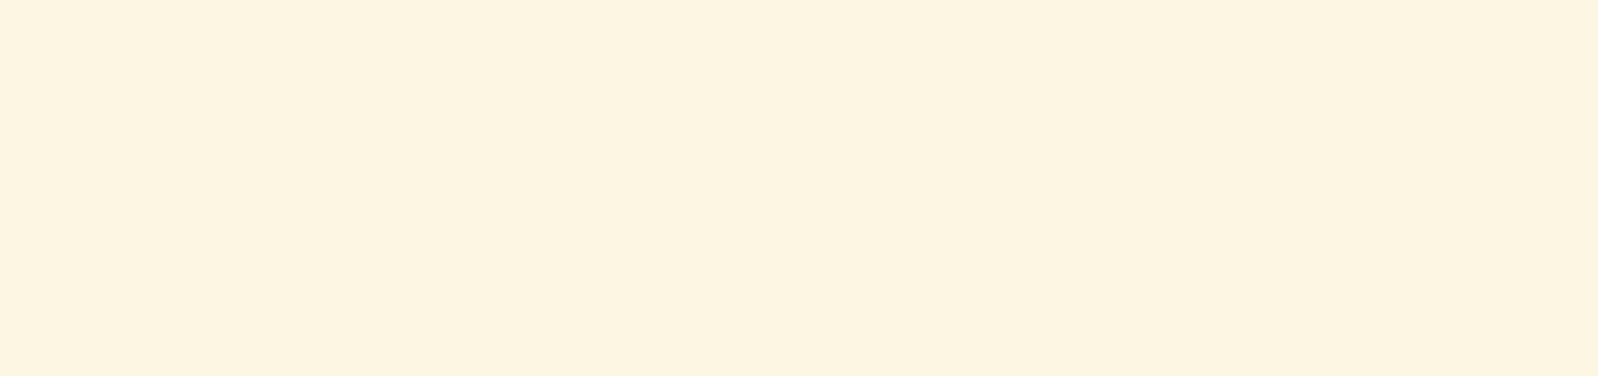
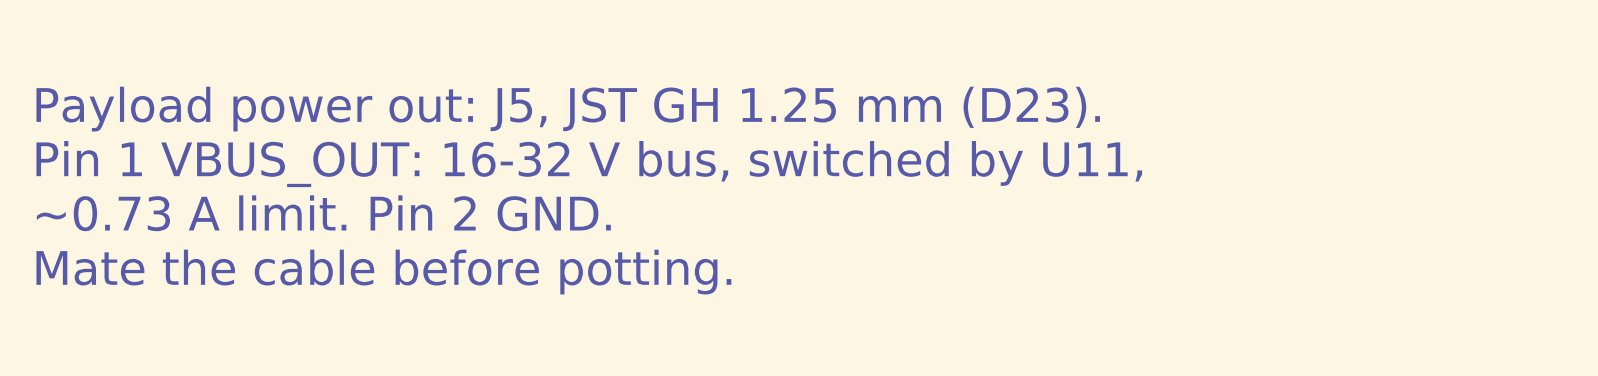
text: none -> Payload power out: J5, JST GH 1.25 mm (D23). (568, 109)
text: none -> Pin 1 VBUS_OUT: 16-32 V bus, switched by U11, (589, 164)
text: none -> ~0.73 A limit. Pin 2 GND. (323, 213)
text: none -> Mate the cable before potting. (383, 272)

